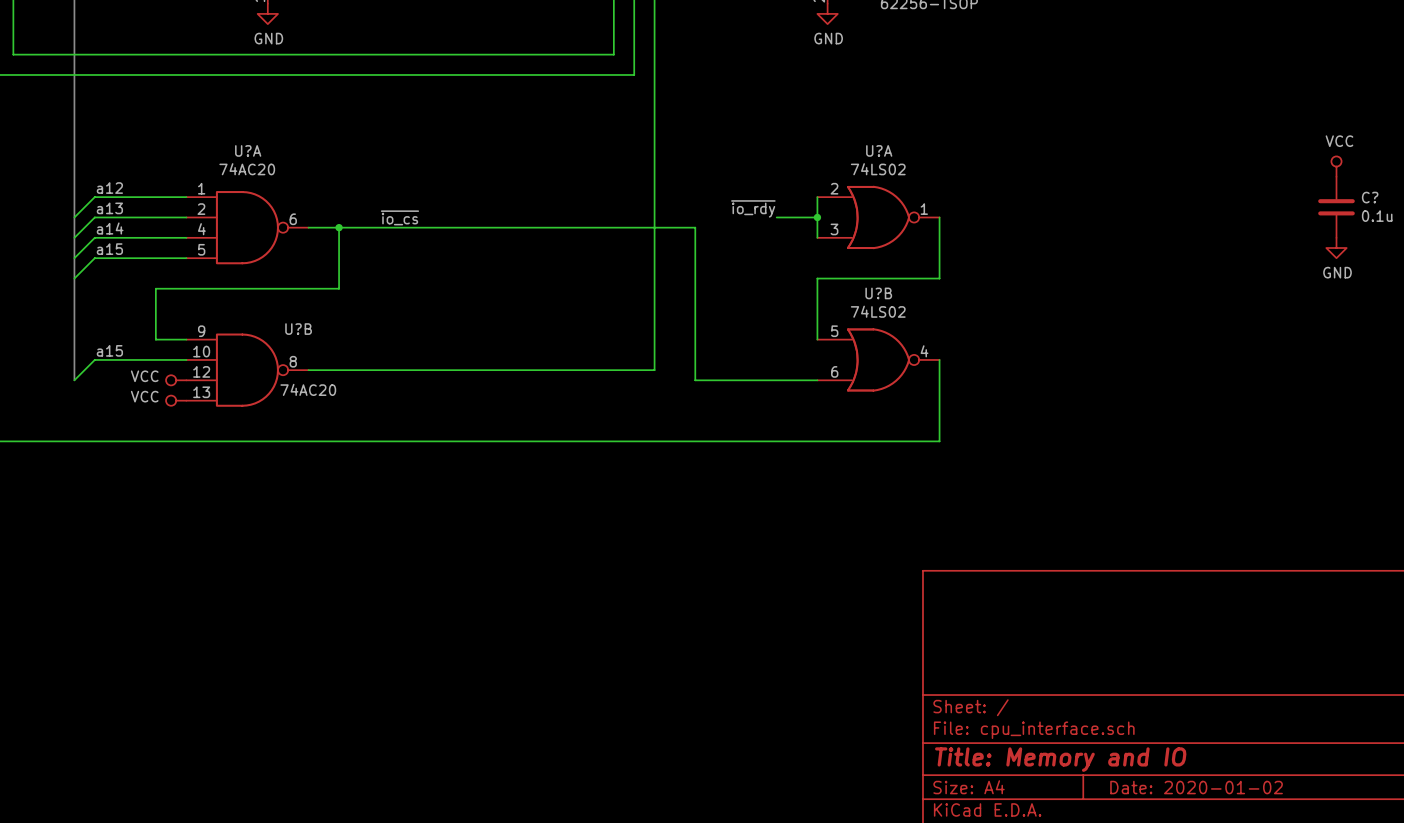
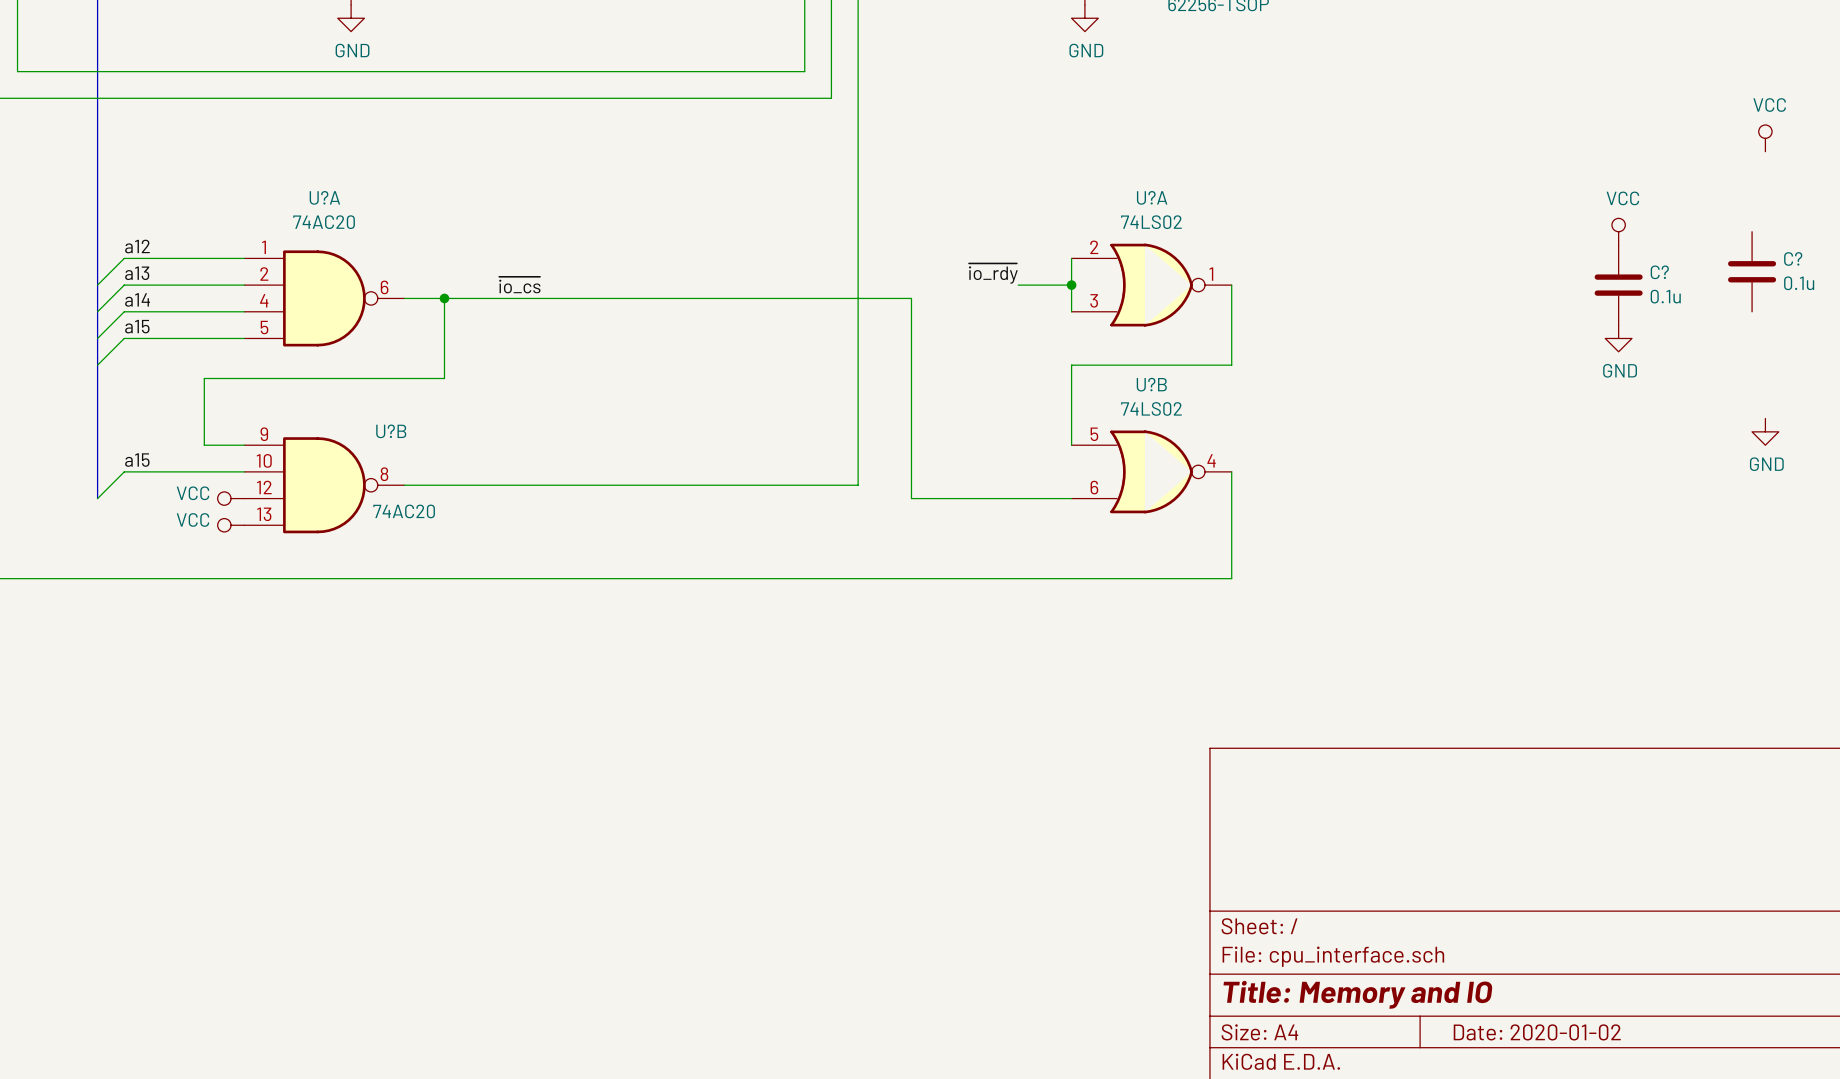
power symbol: none -> VCC (1765, 138)
power symbol: VCC (1336, 166) -> none
power symbol: none -> VCC (1618, 231)
C?: none -> 0.1u (1618, 285)
power symbol: GND (1336, 248) -> none
power symbol: none -> GND (1618, 338)
power symbol: none -> GND (1765, 431)

